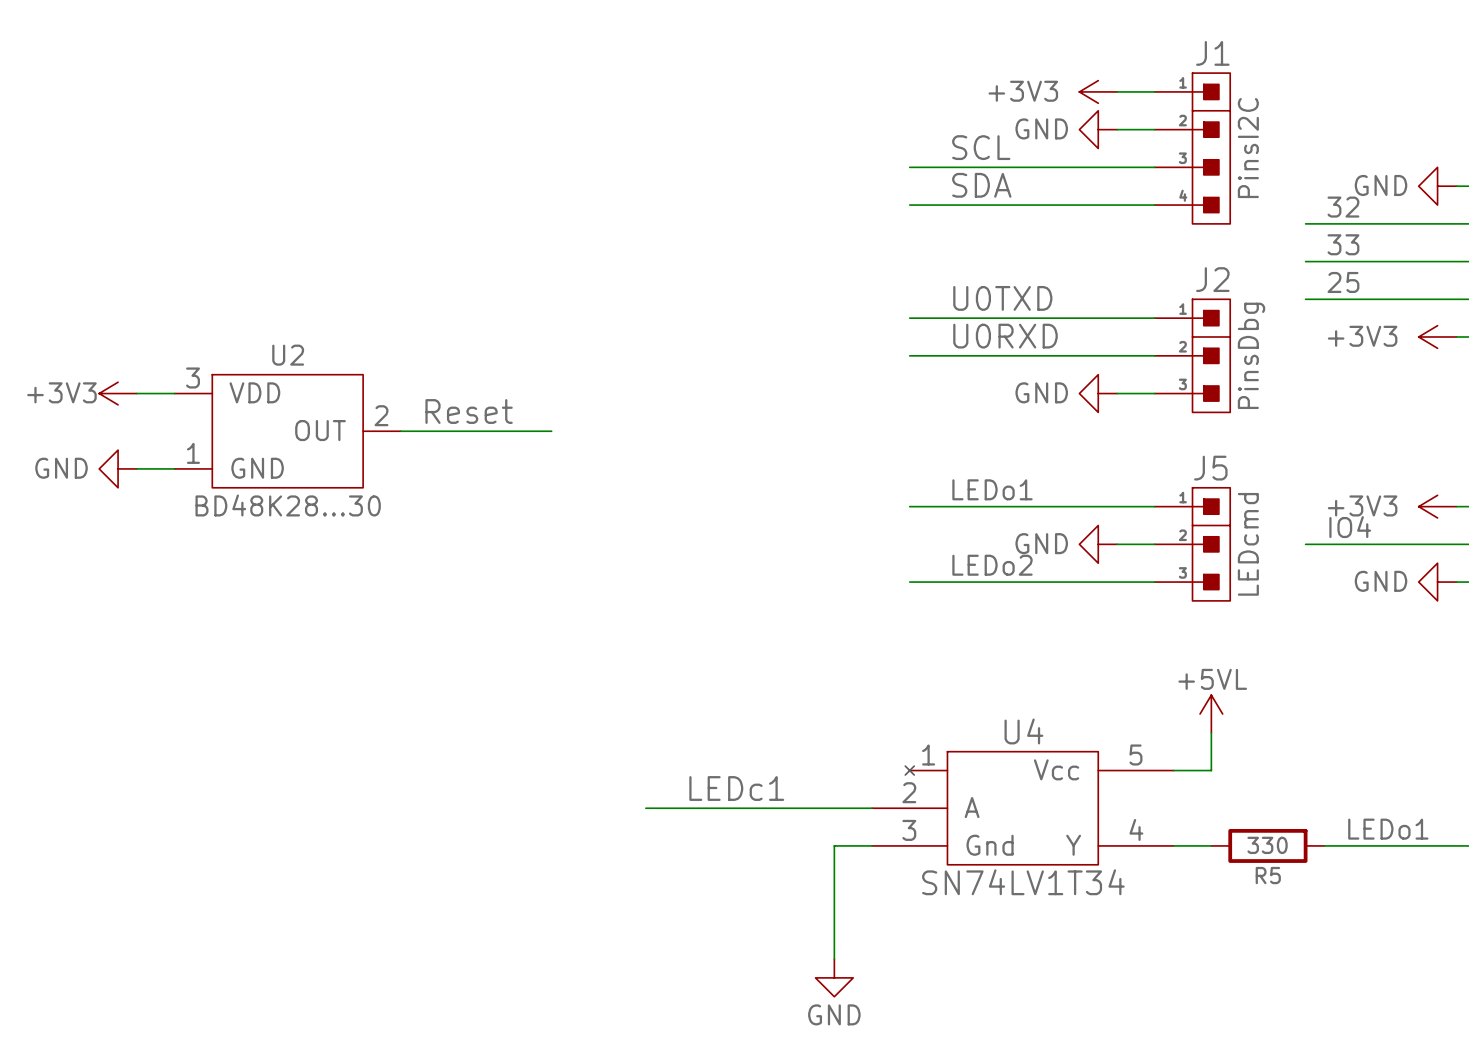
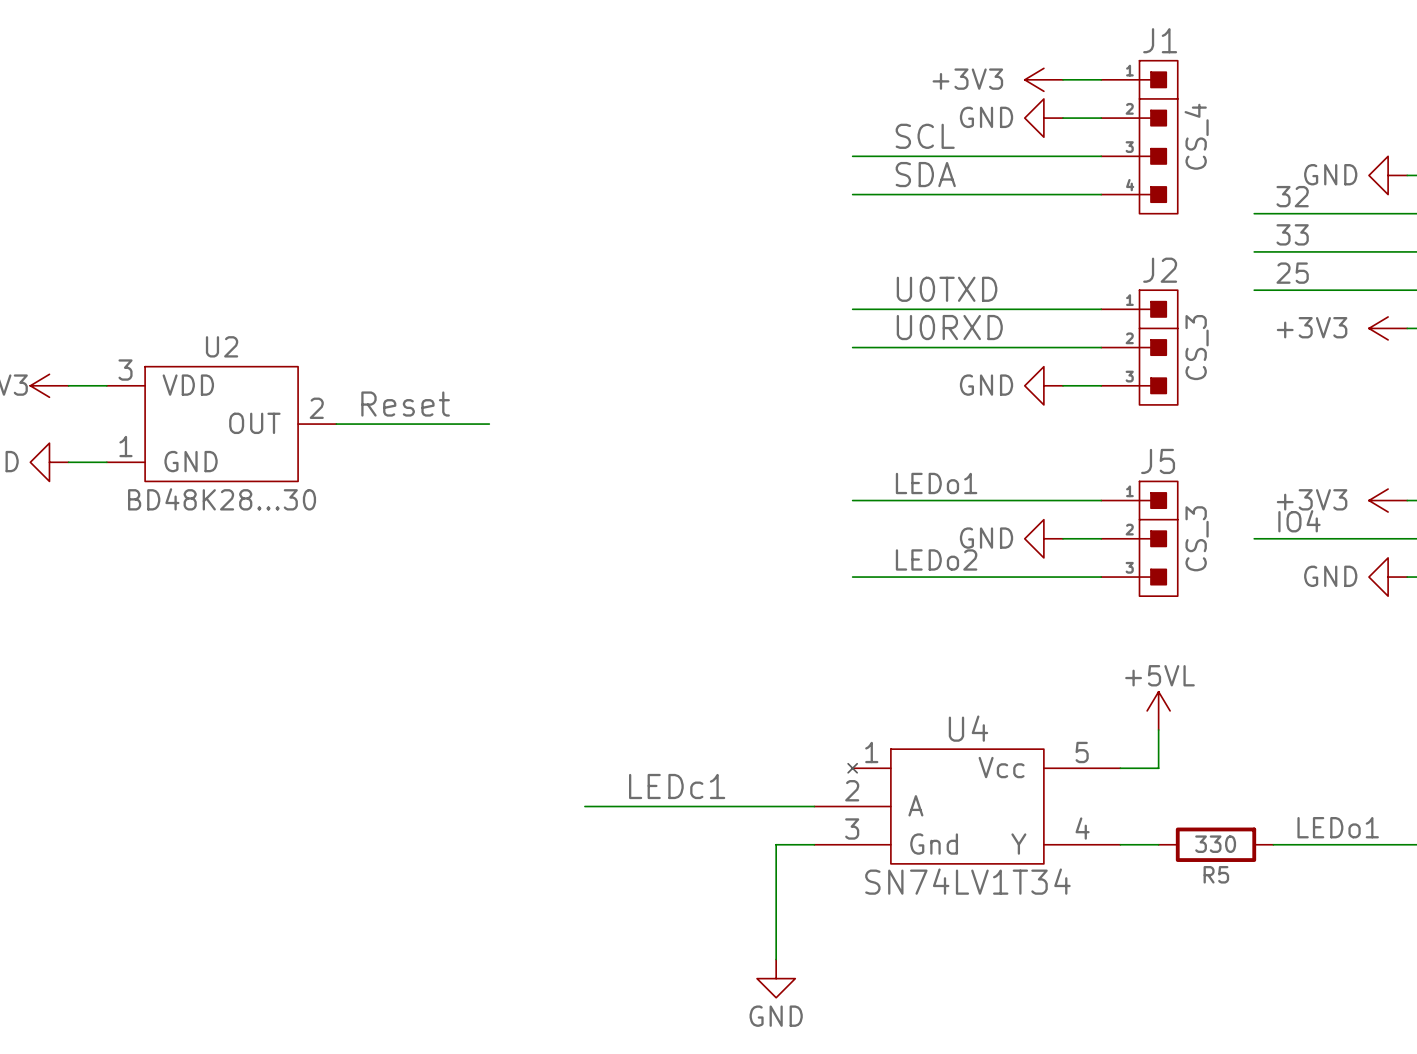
J1 value: PinsI2C (1248, 148) -> CS_4 (1196, 136)
J2 value: PinsDbg (1251, 355) -> CS_3 (1197, 347)
J5 value: LEDcmd (1248, 544) -> CS_3 (1197, 538)

